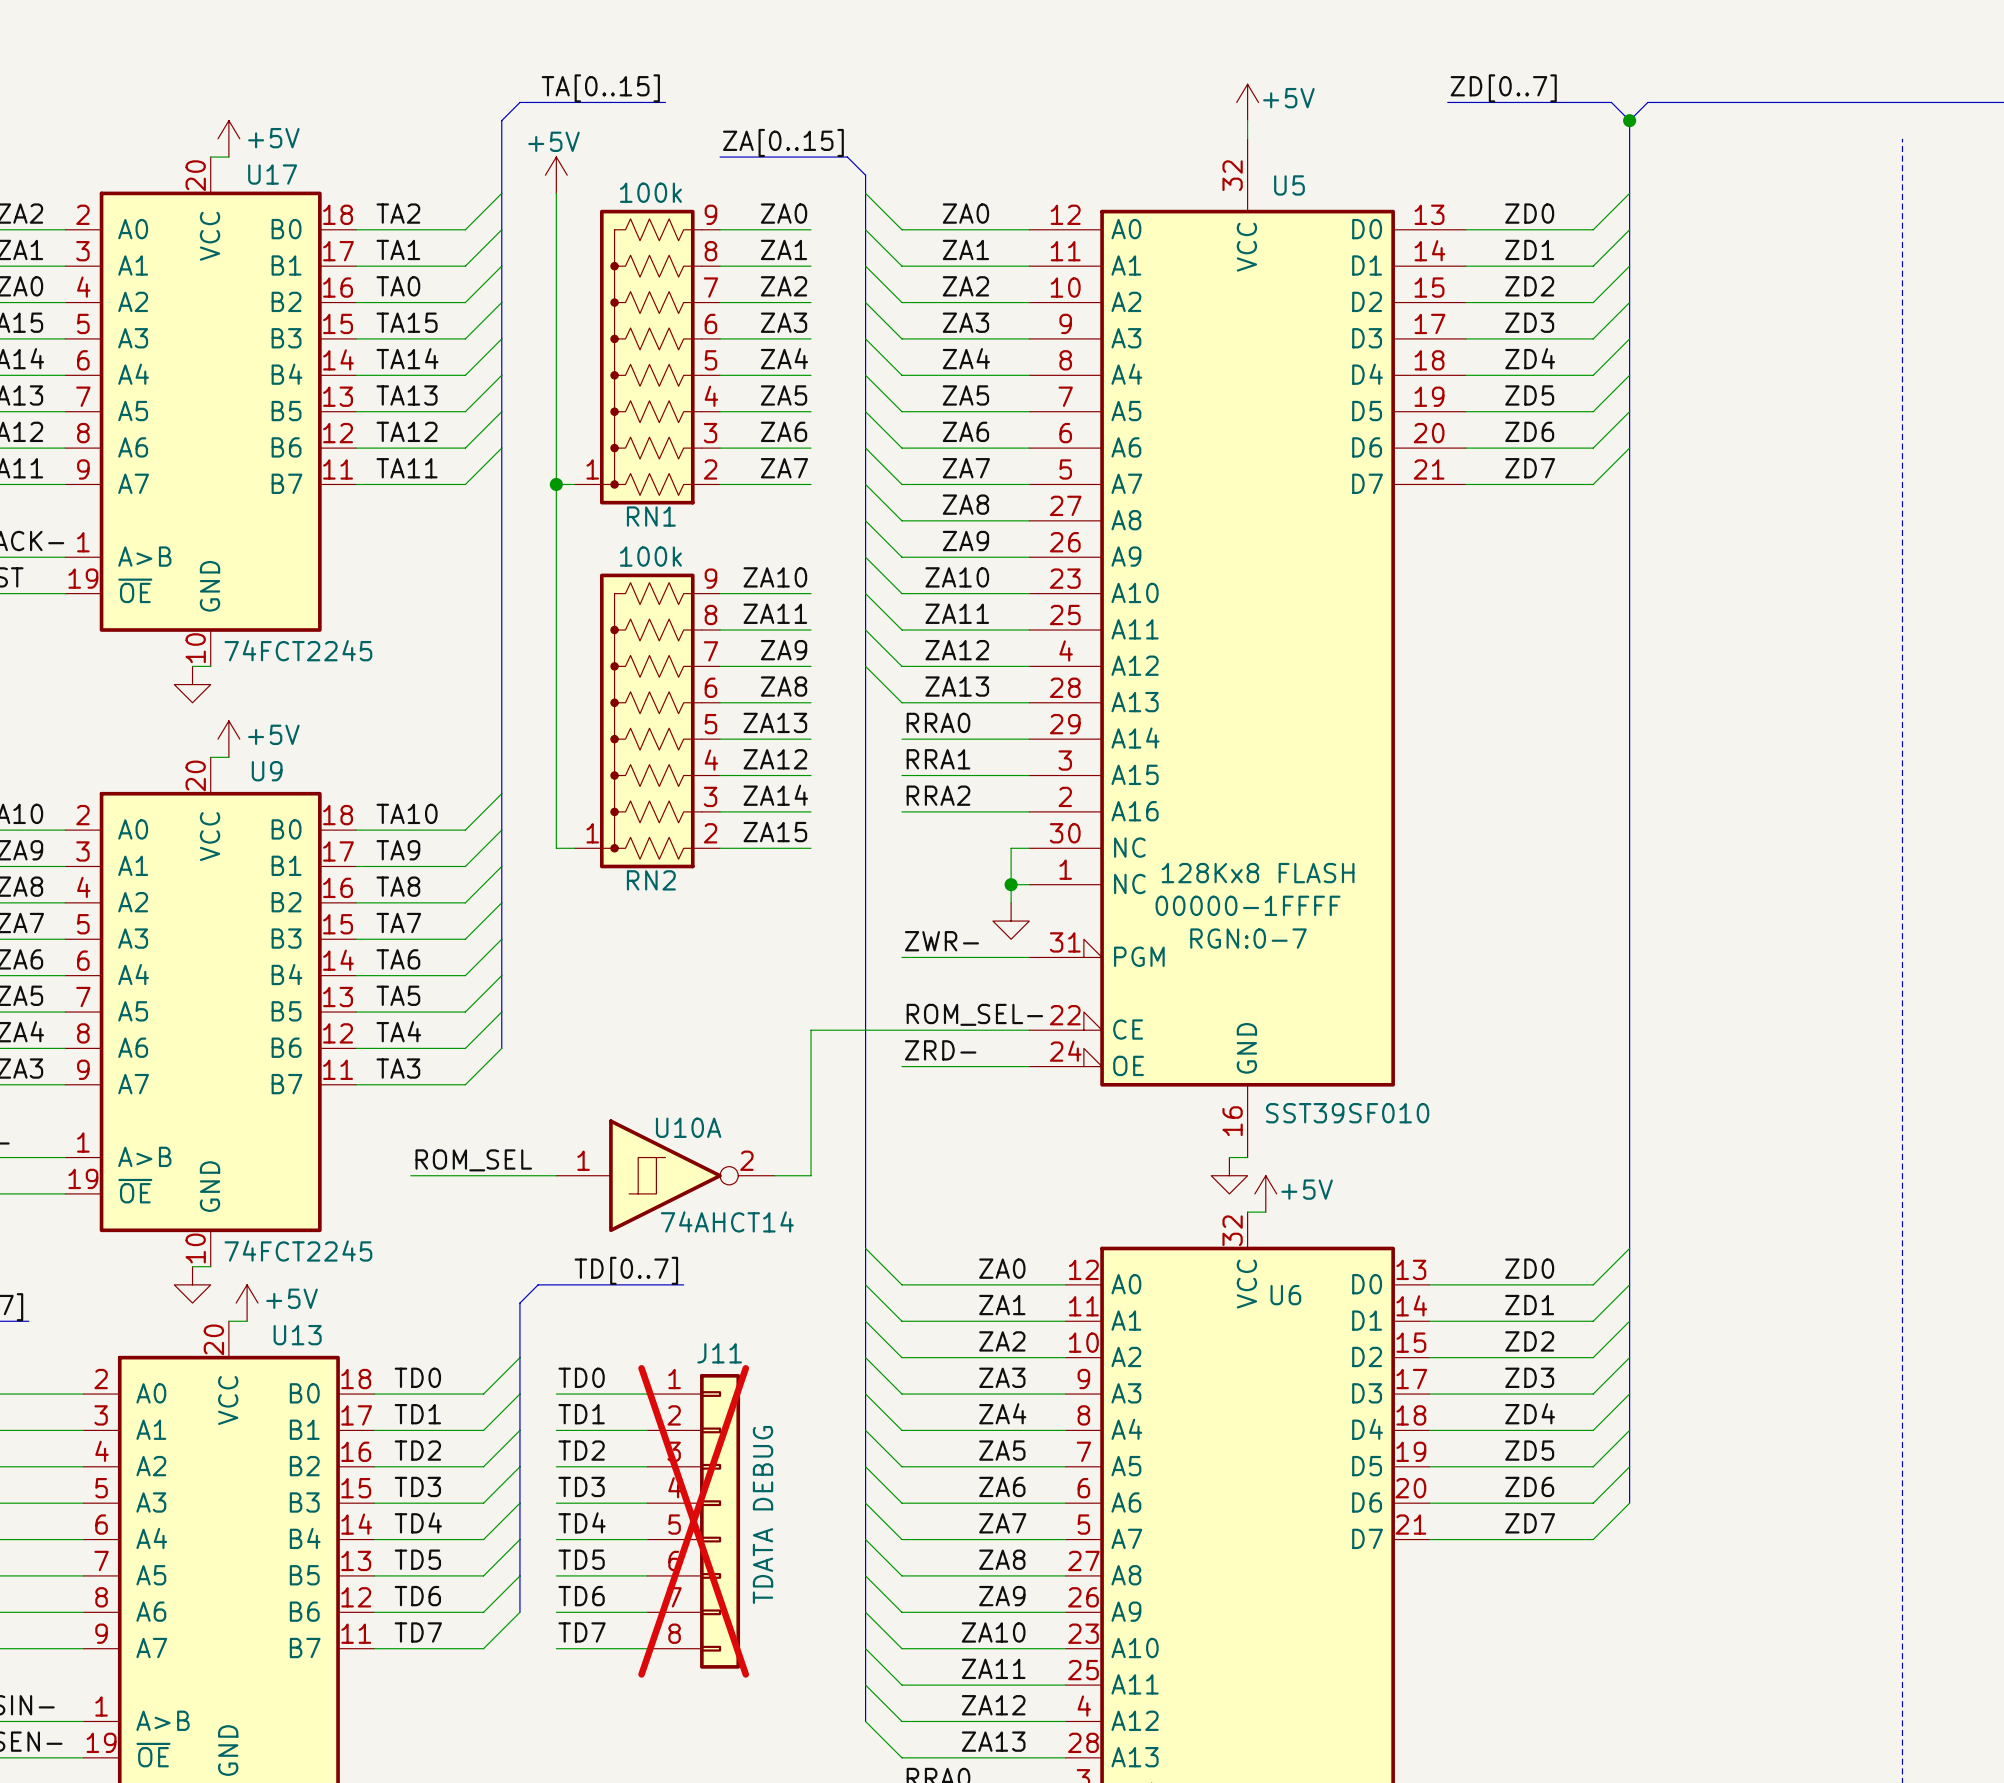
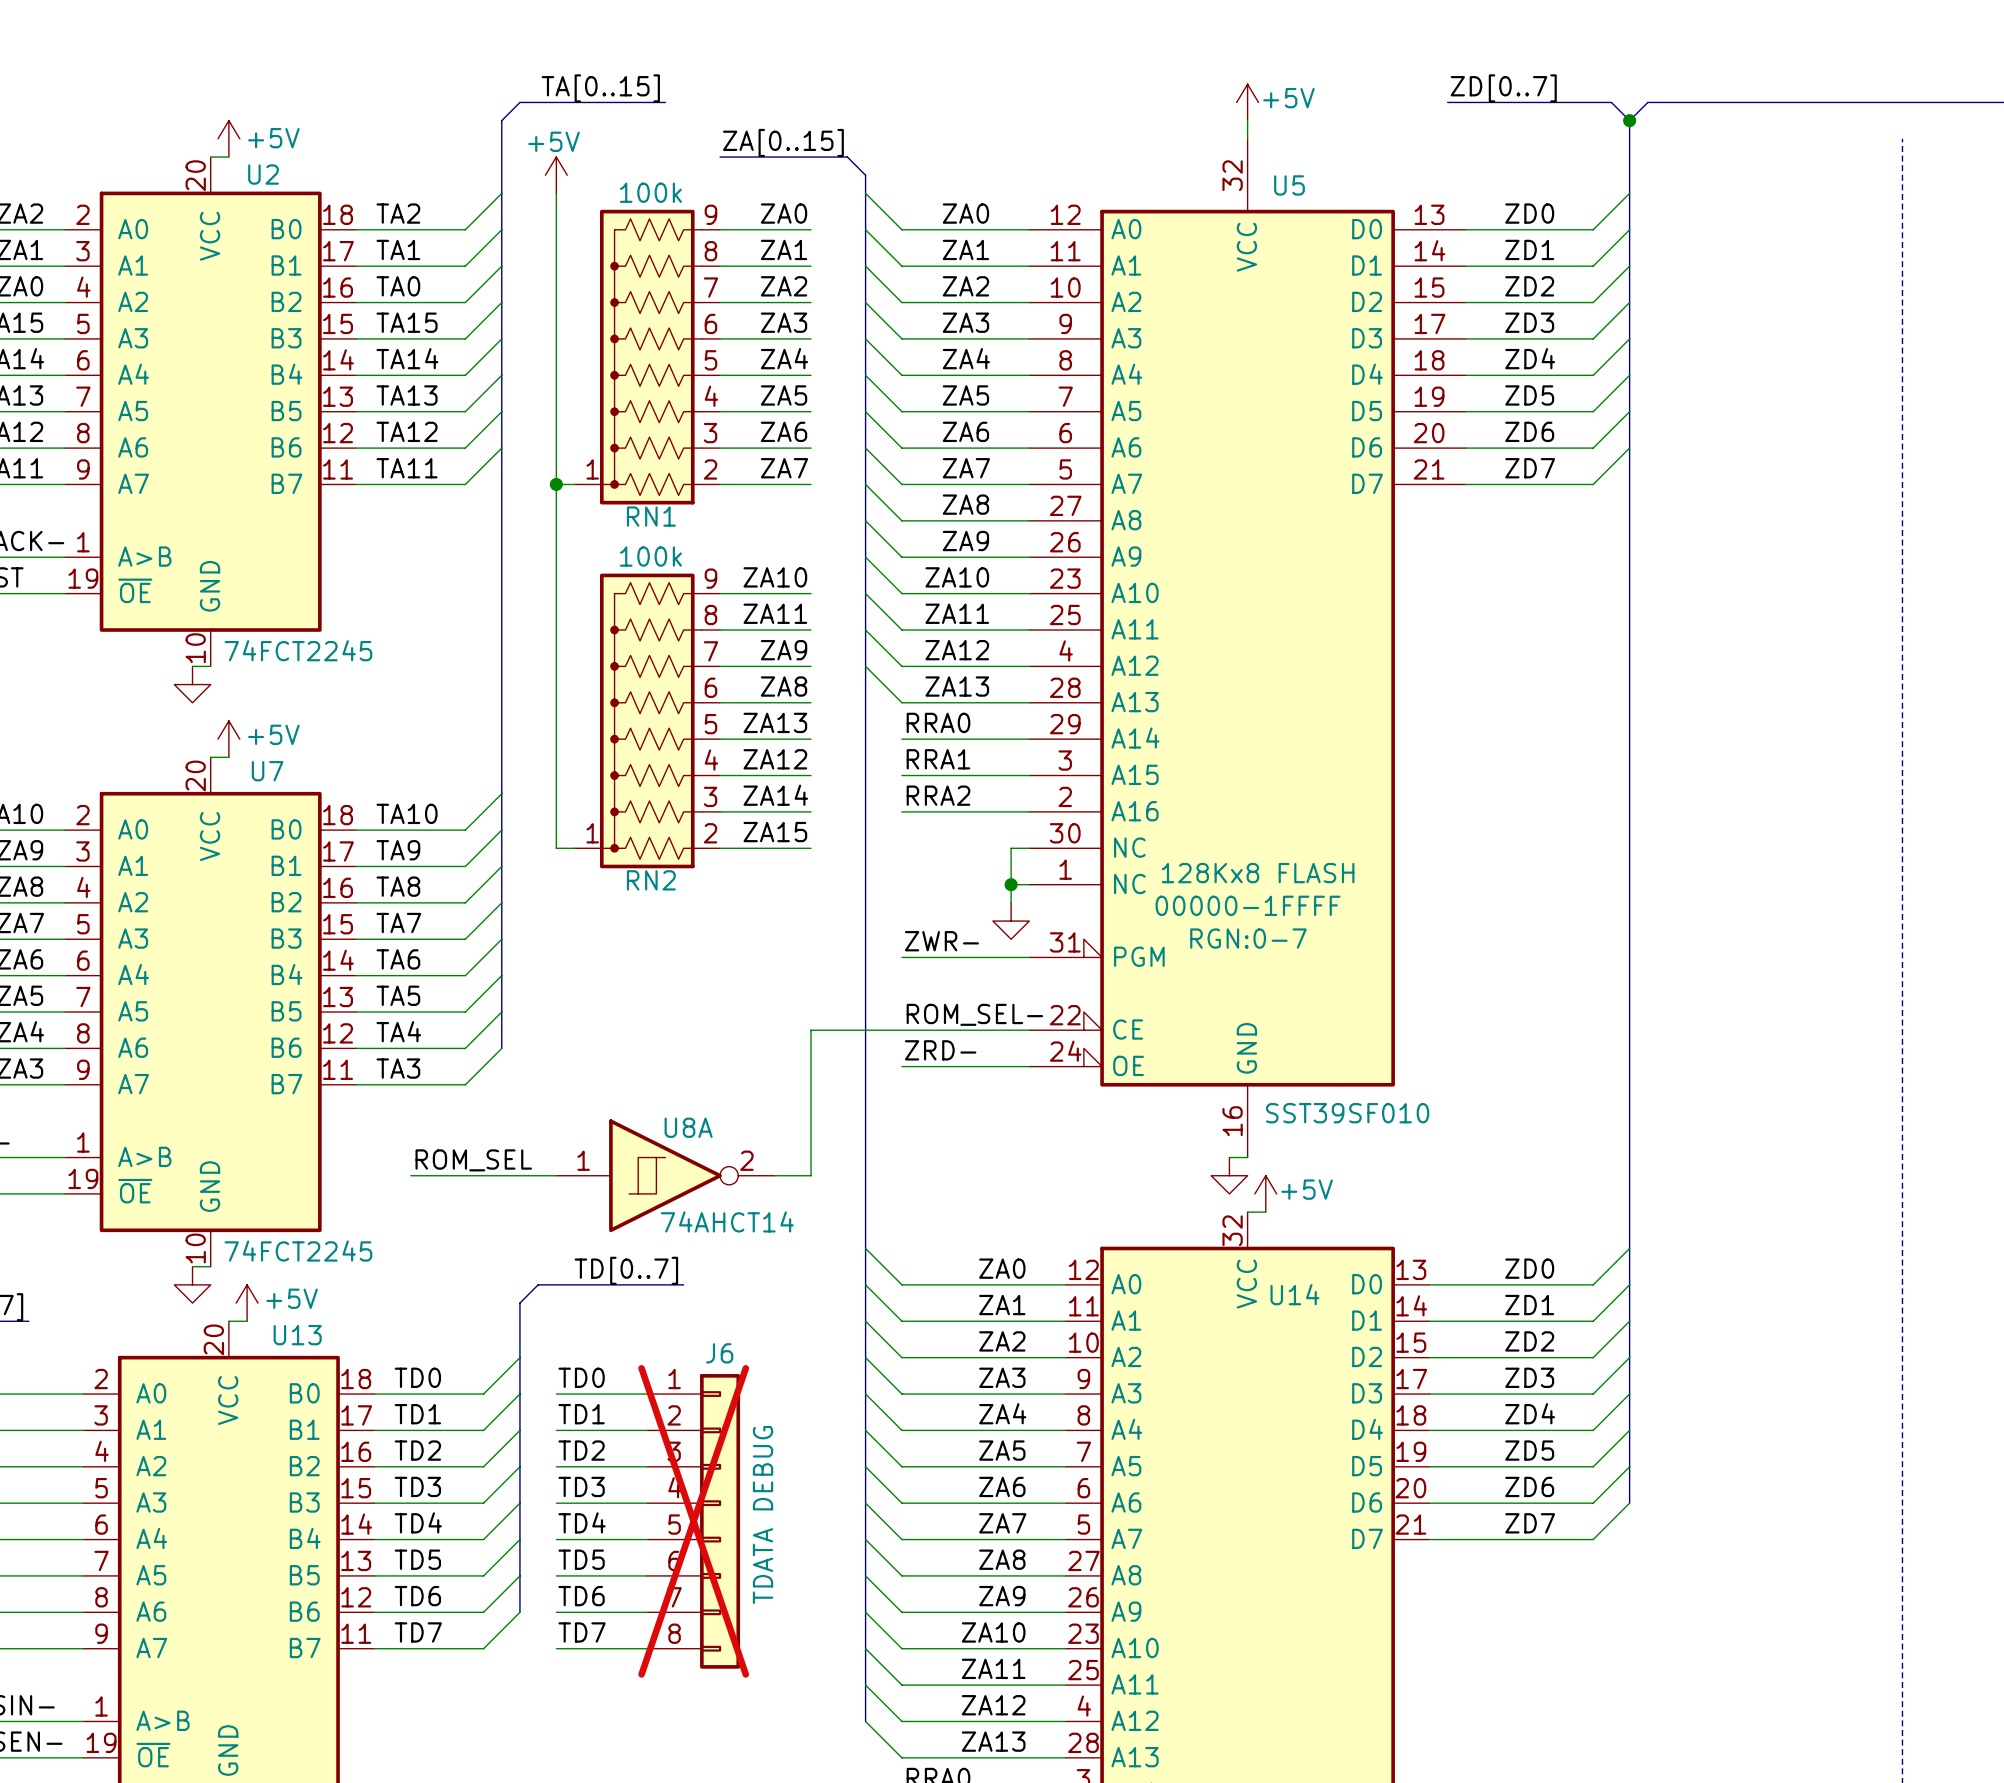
U17 name: U17 (272, 174) -> U2 (263, 174)
U9 name: U9 (267, 771) -> U7 (267, 771)
U10A name: U10A (688, 1127) -> U8A (688, 1127)
U6 name: U6 (1285, 1295) -> U14 (1294, 1294)
J11 name: J11 (719, 1353) -> J6 (719, 1353)

